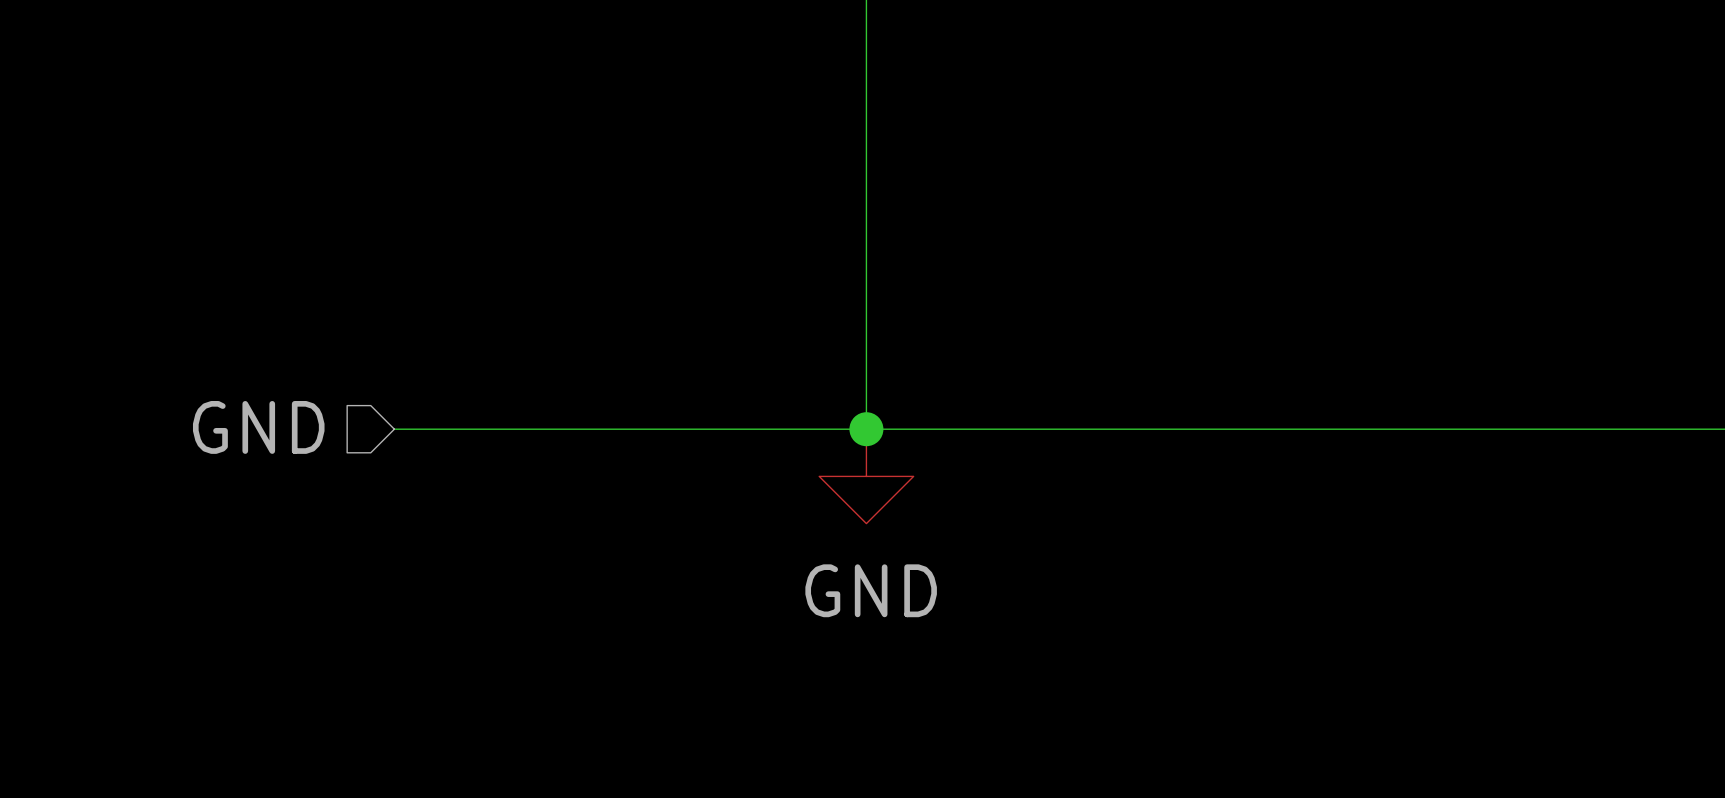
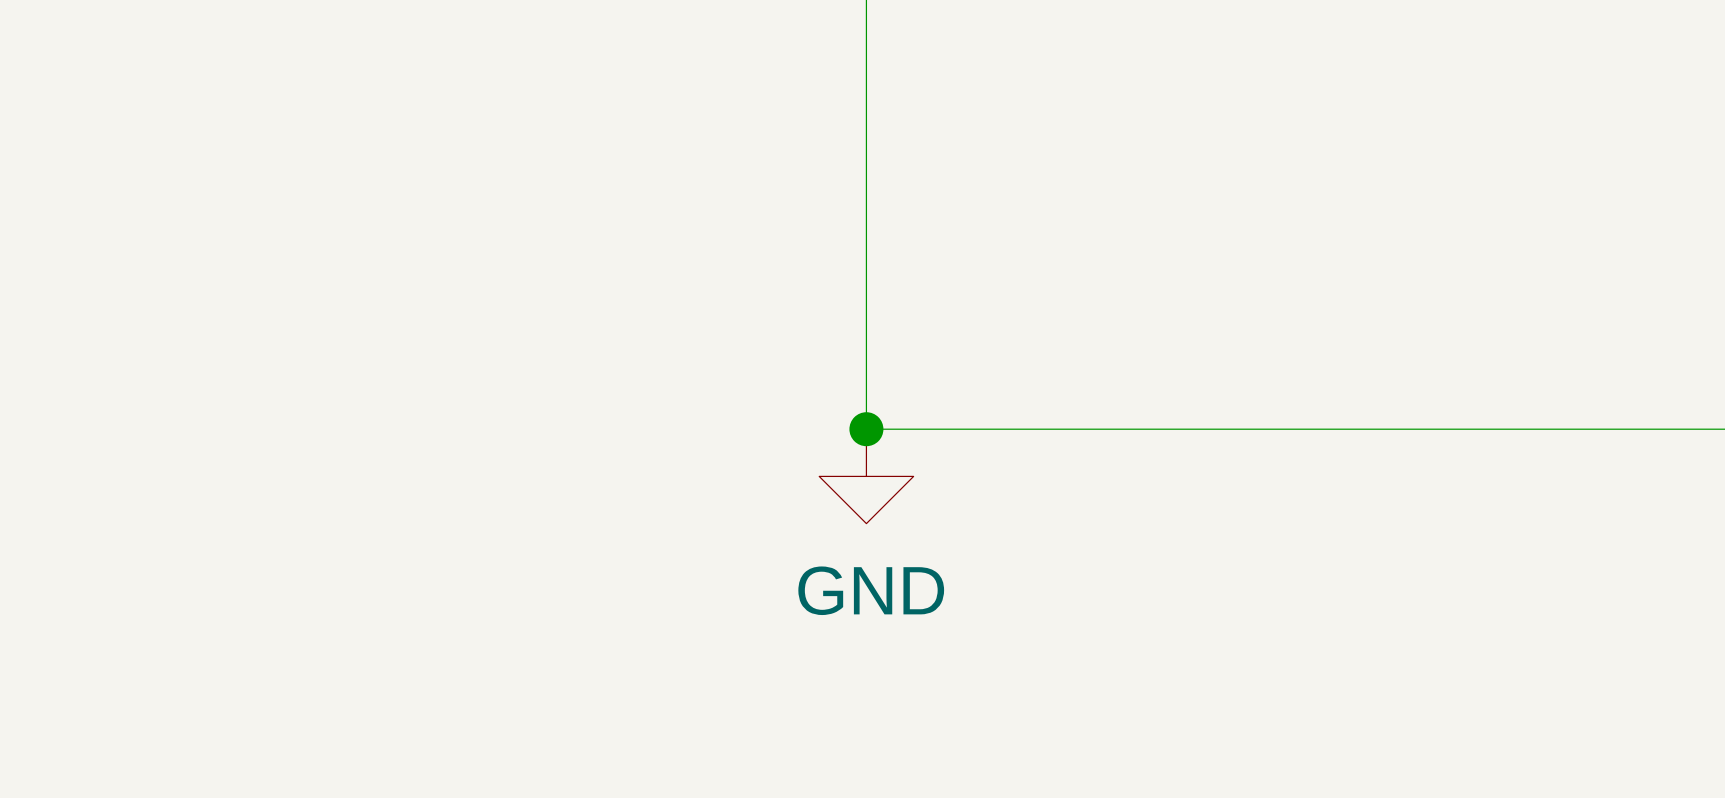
hierarchical label: GND (258, 427) -> none
wire: (394, 429) (866, 429) -> none

